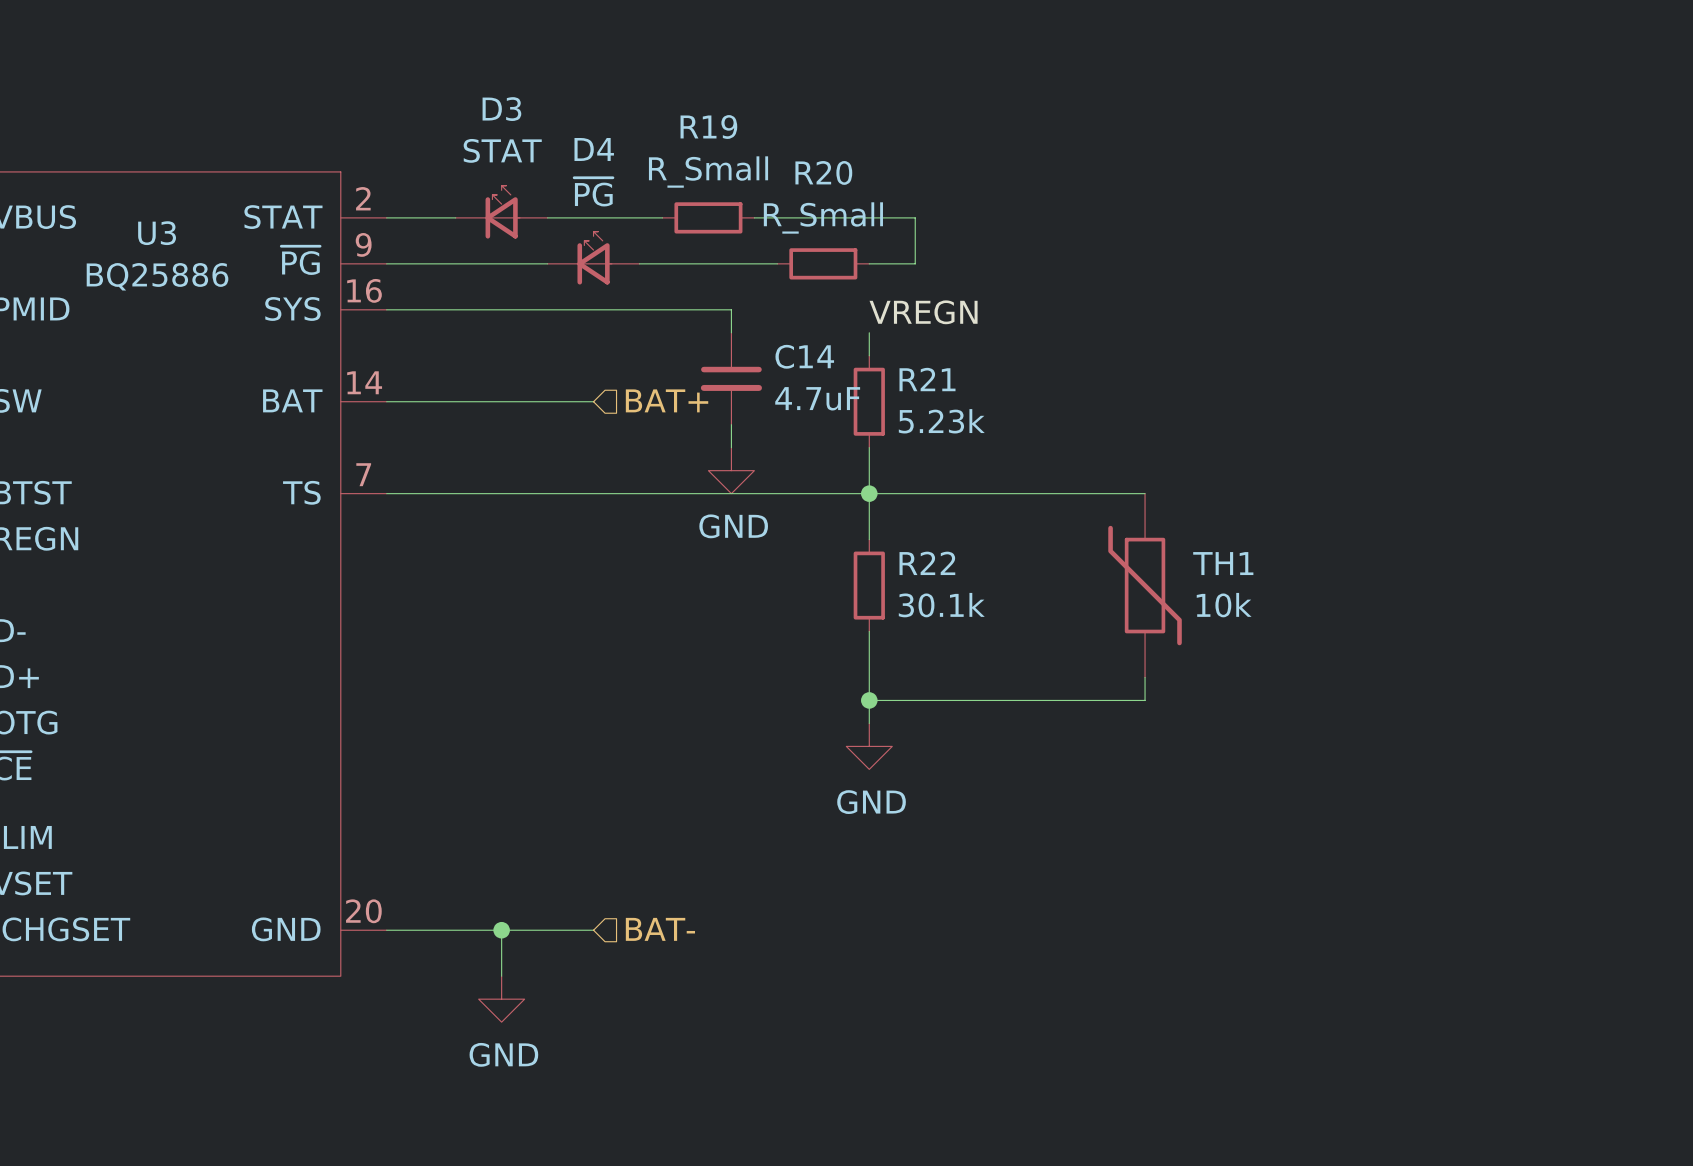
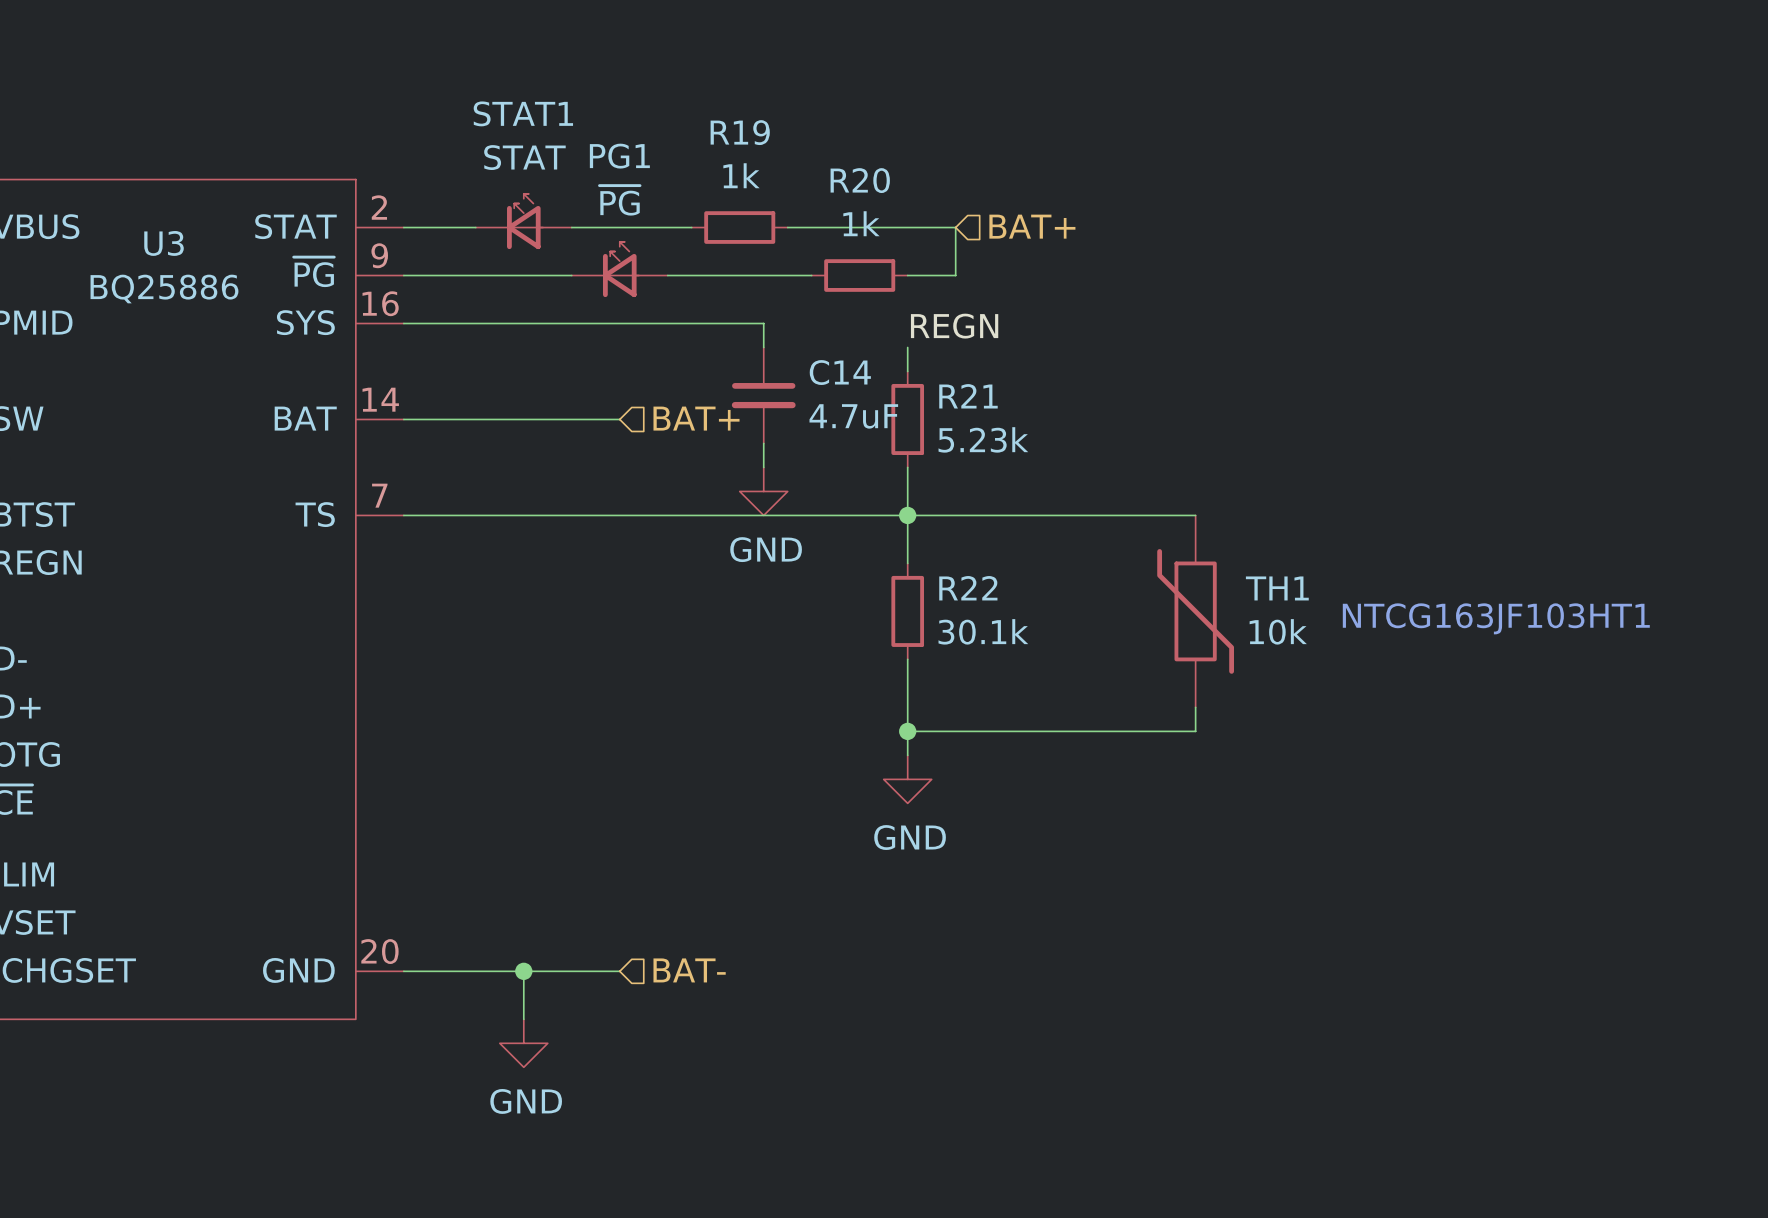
D3 name: D3 (501, 109) -> STAT1 (523, 113)
D4 name: D4 (594, 149) -> PG1 (619, 156)
R19 value: R_Small (708, 172) -> 1k (741, 175)
R20 value: R_Small (823, 217) -> 1k (861, 223)
hierarchical label: none -> BAT+ (1032, 226)
label: VREGN (923, 312) -> REGN (954, 326)
text: none -> NTCG163JF103HT1 (1496, 618)

